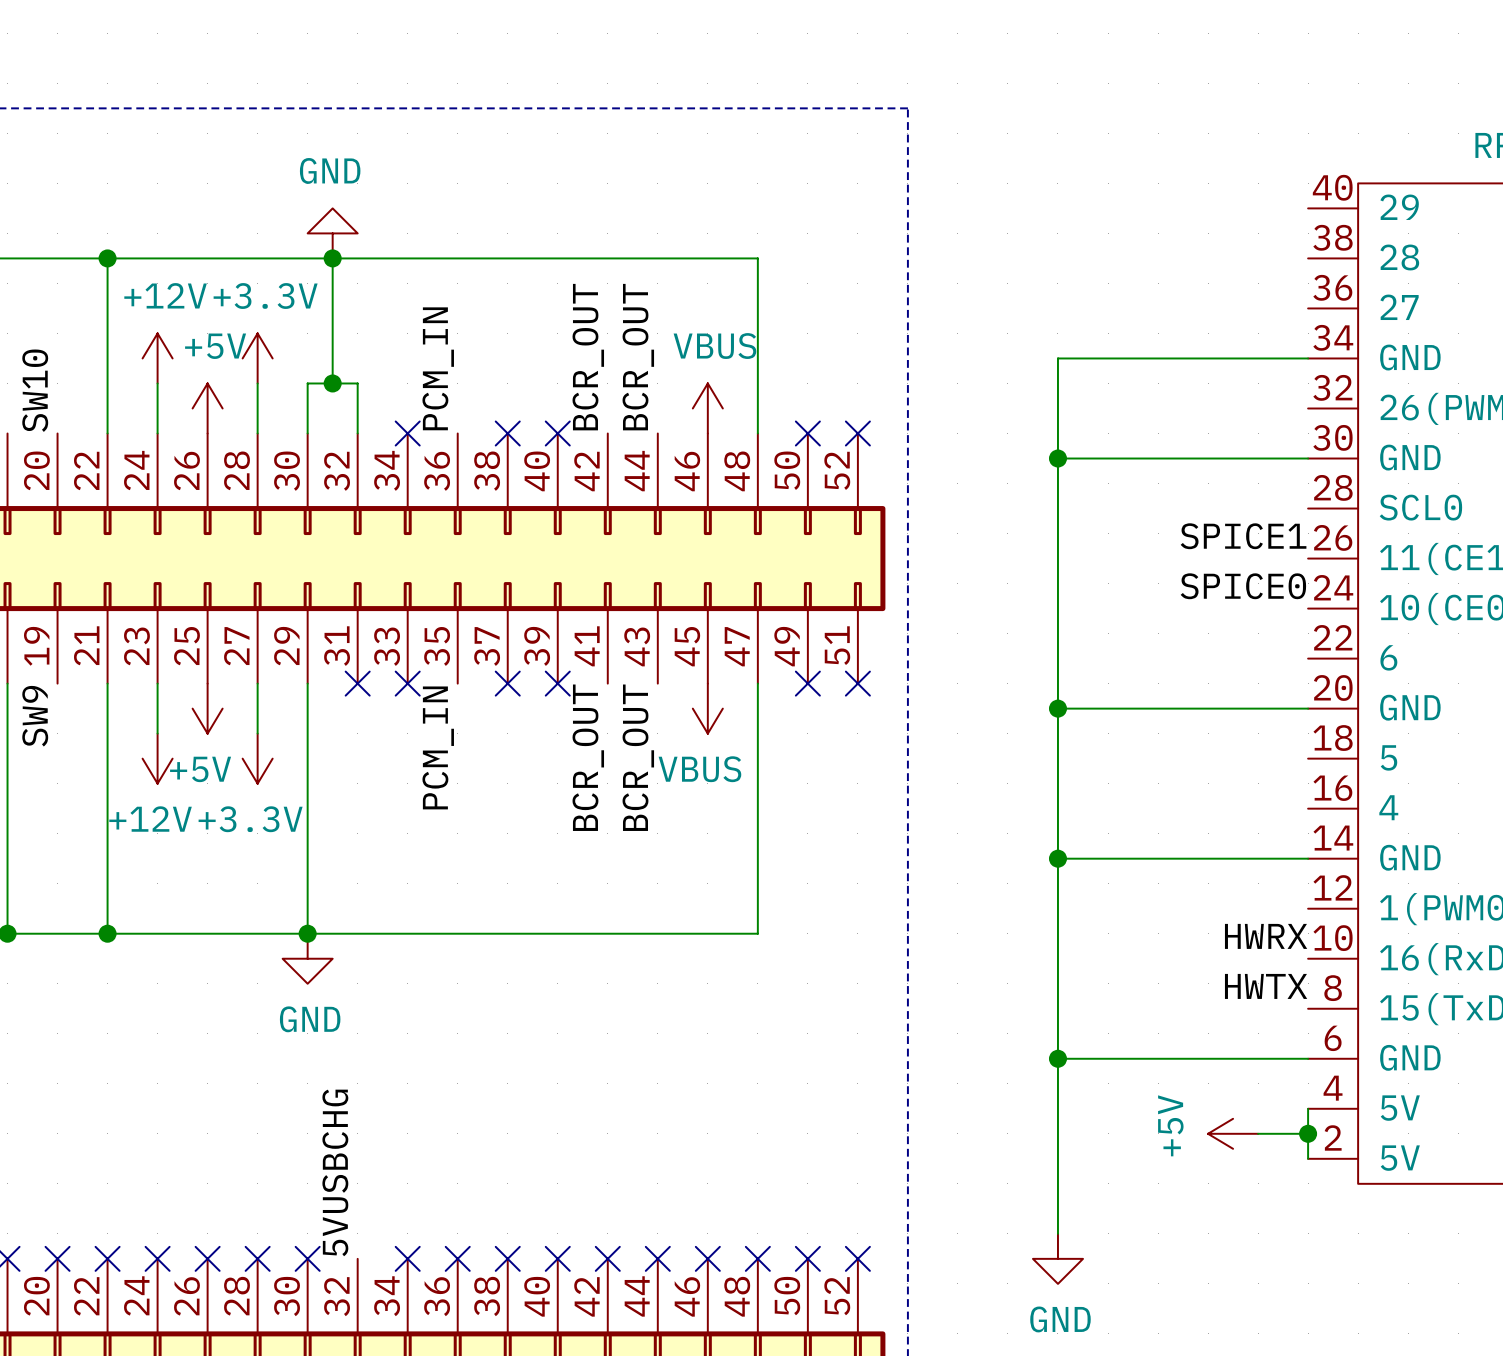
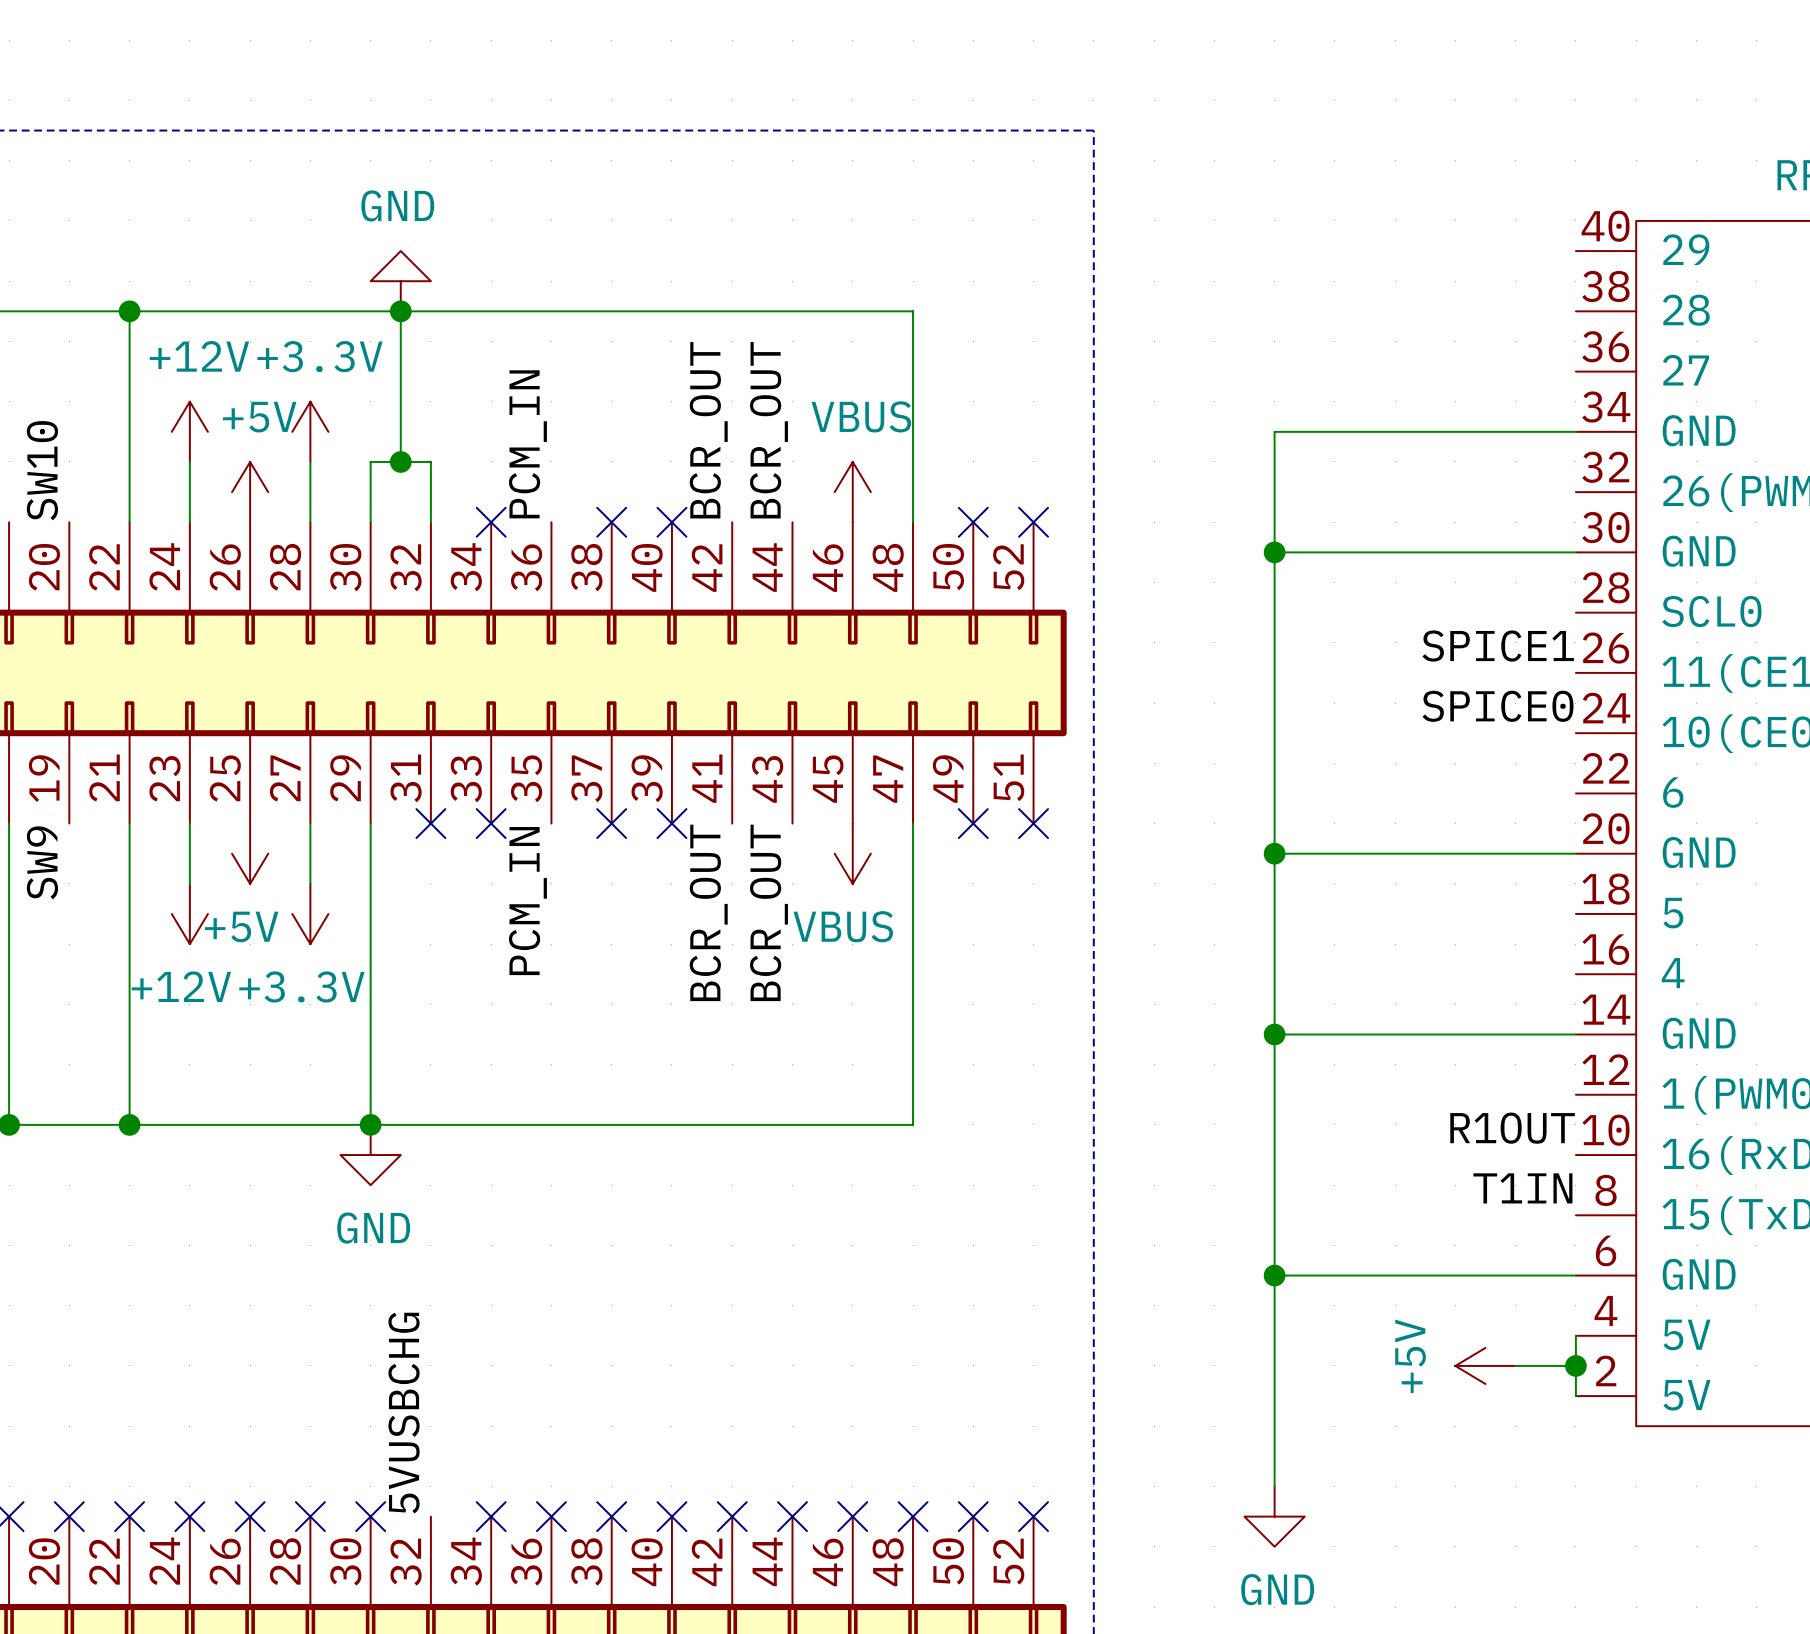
label: HWRX (1266, 936) -> R1OUT (1512, 1128)
label: HWTX (1266, 986) -> T1IN (1522, 1188)

